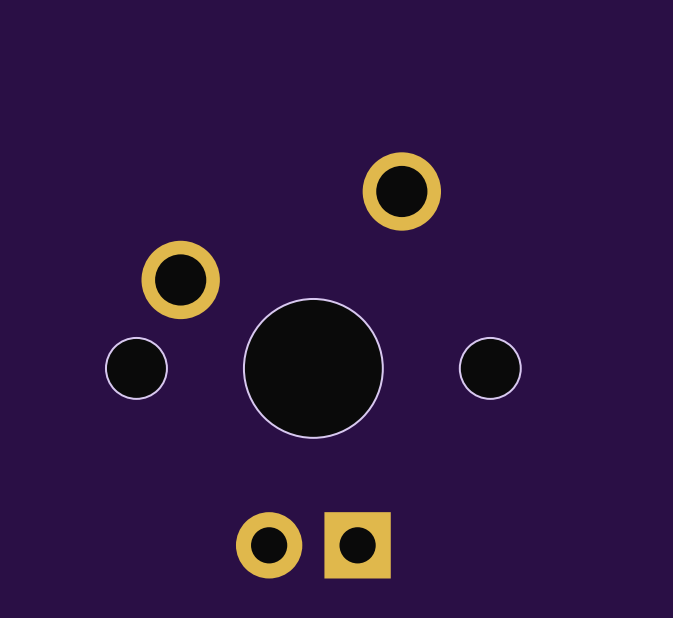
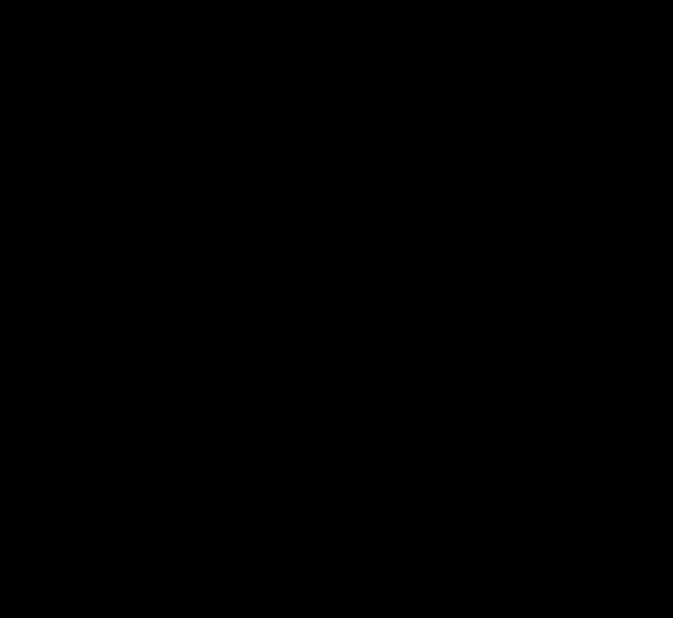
part: (313, 365) -> none

